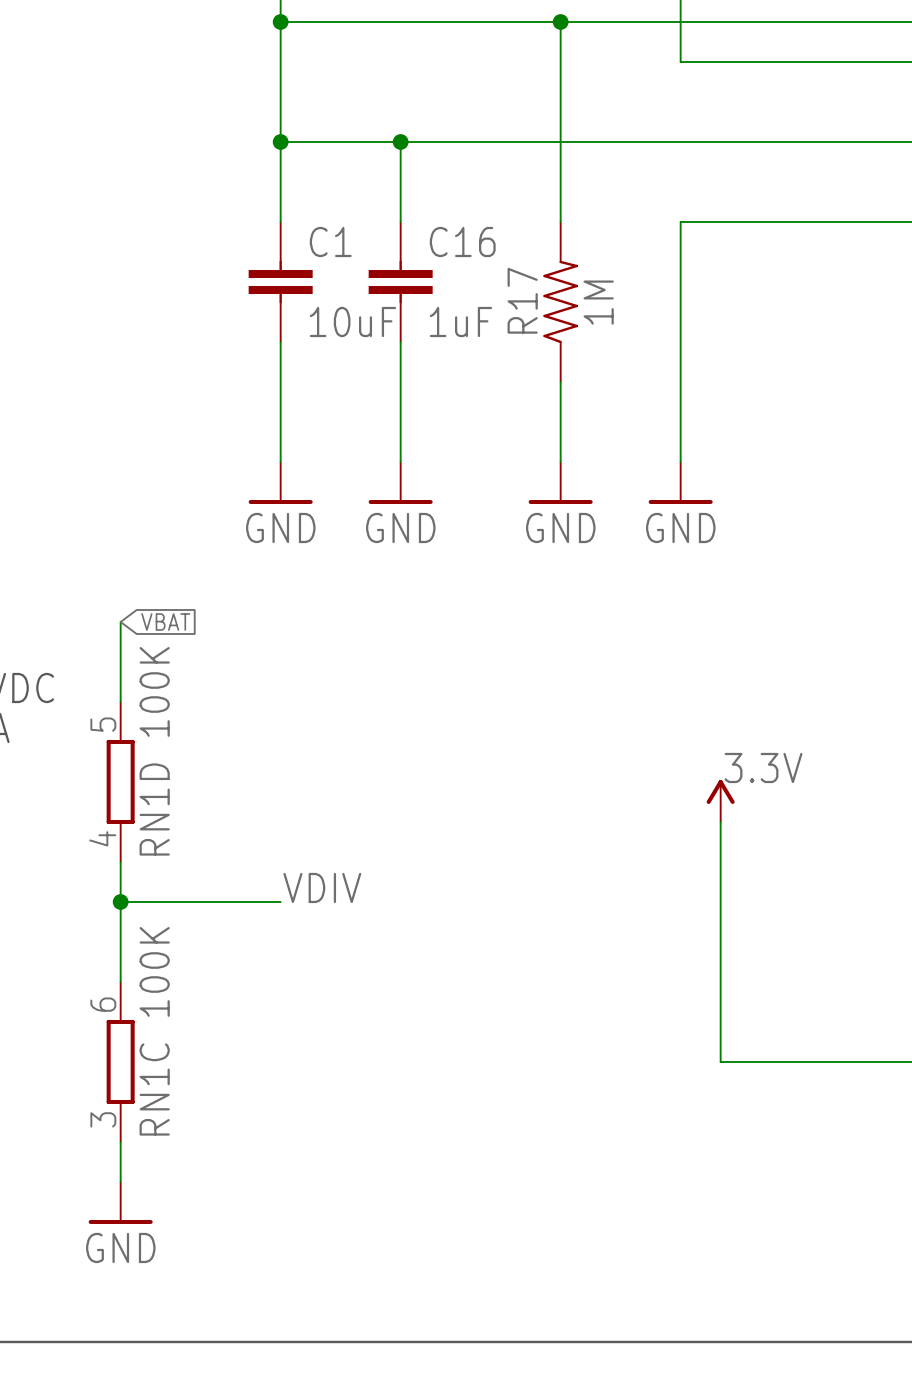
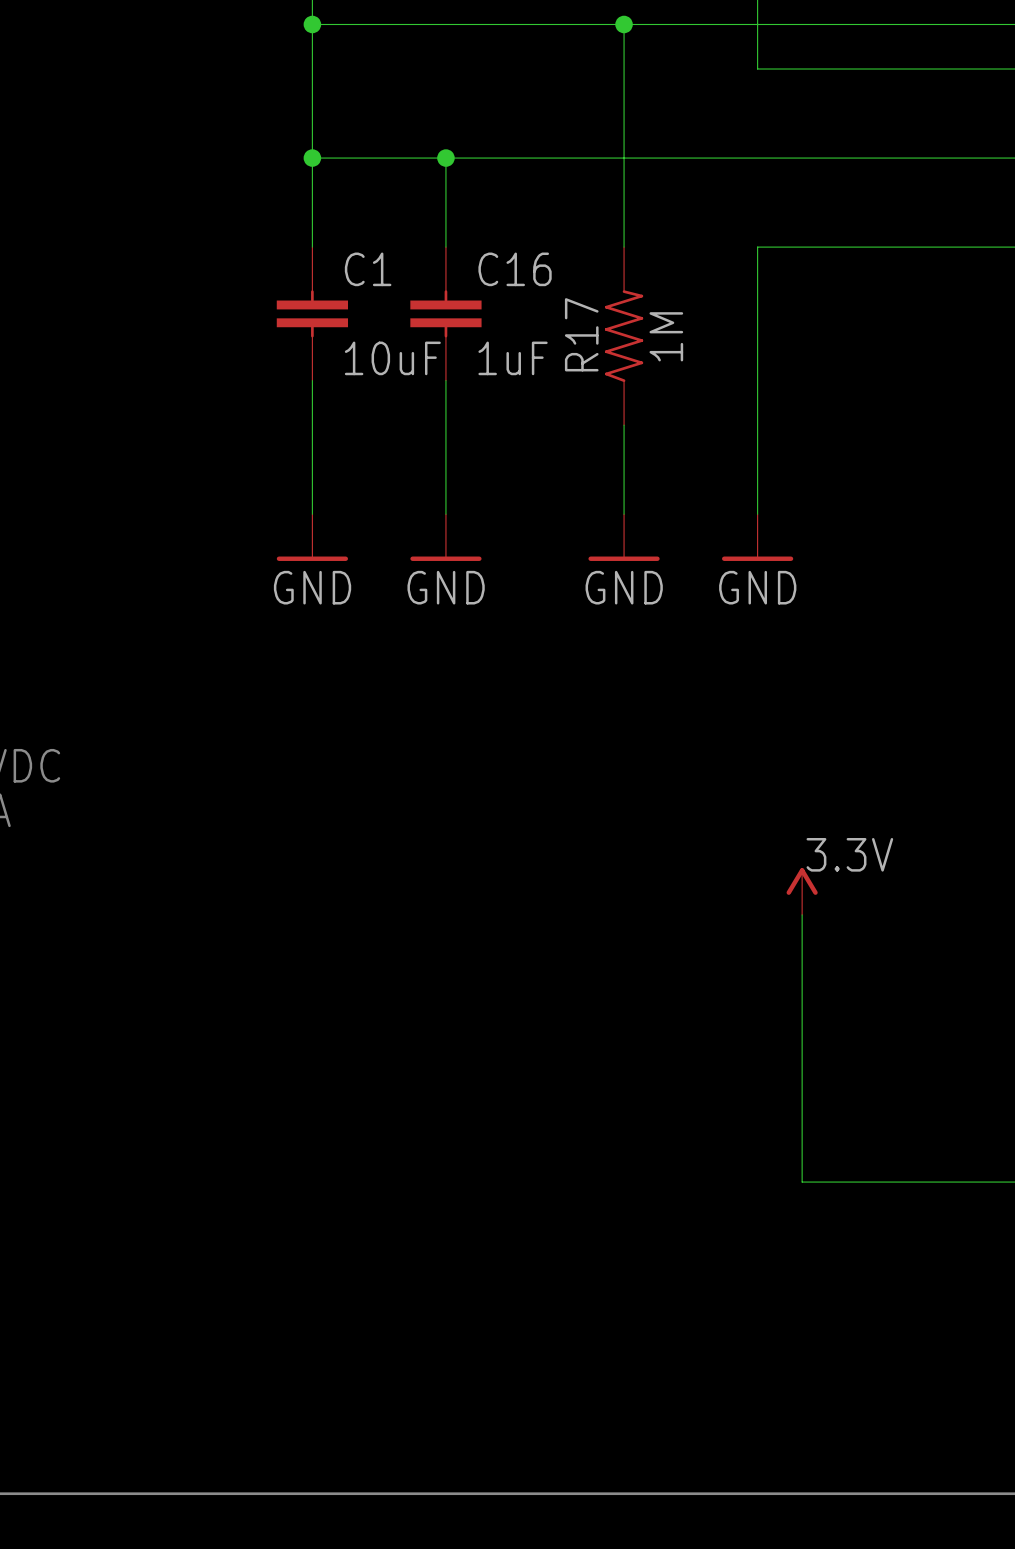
wire: (120, 621) (120, 701) -> none
global label: VBAT (165, 621) -> none
RN1D: 100K (120, 781) -> none
wire: (120, 861) (120, 981) -> none
label: VDIV (322, 887) -> none
wire: (120, 901) (280, 901) -> none
junction: (120, 901) -> none
RN1C: 100K (120, 1061) -> none
wire: (120, 1141) (120, 1181) -> none
power symbol: GND (120, 1202) -> none

